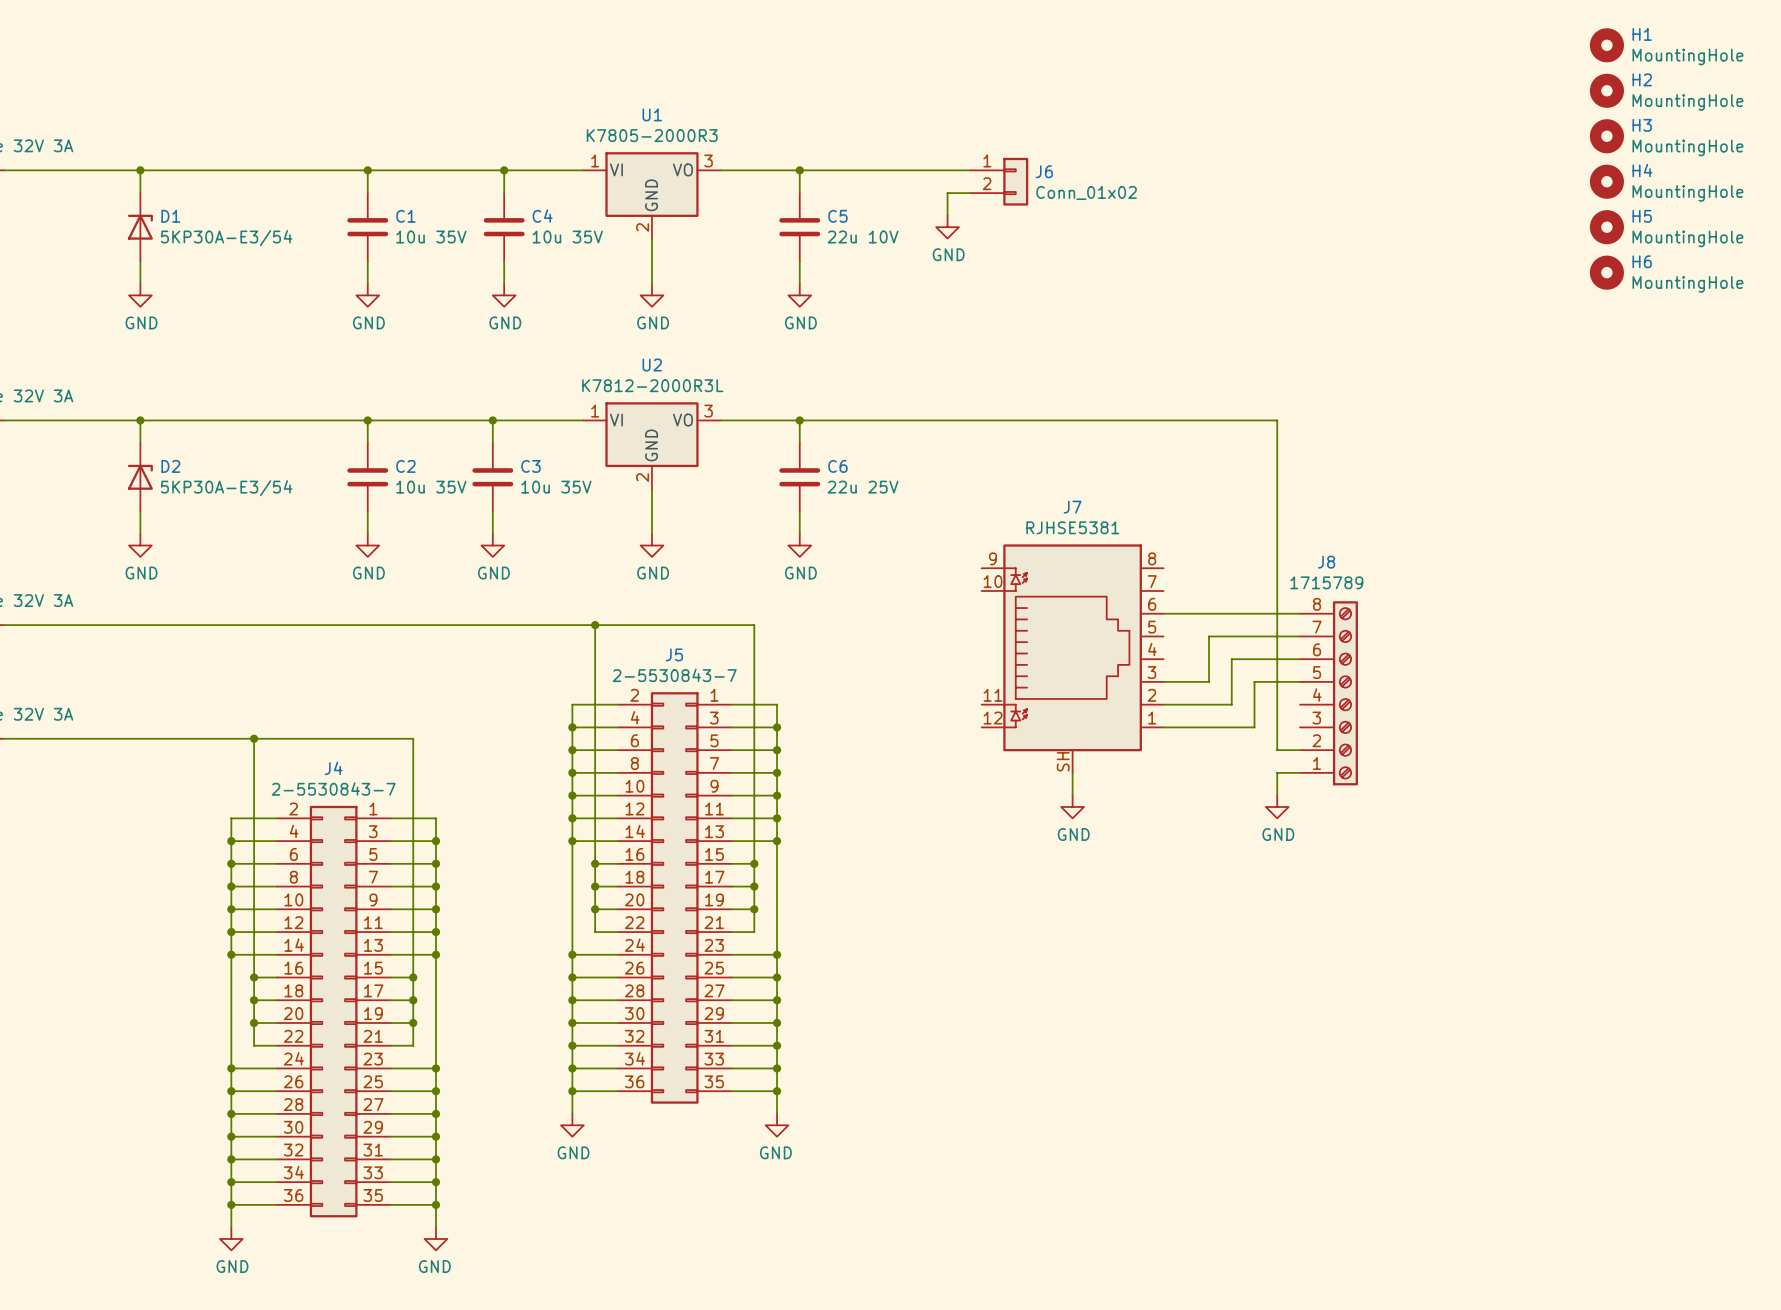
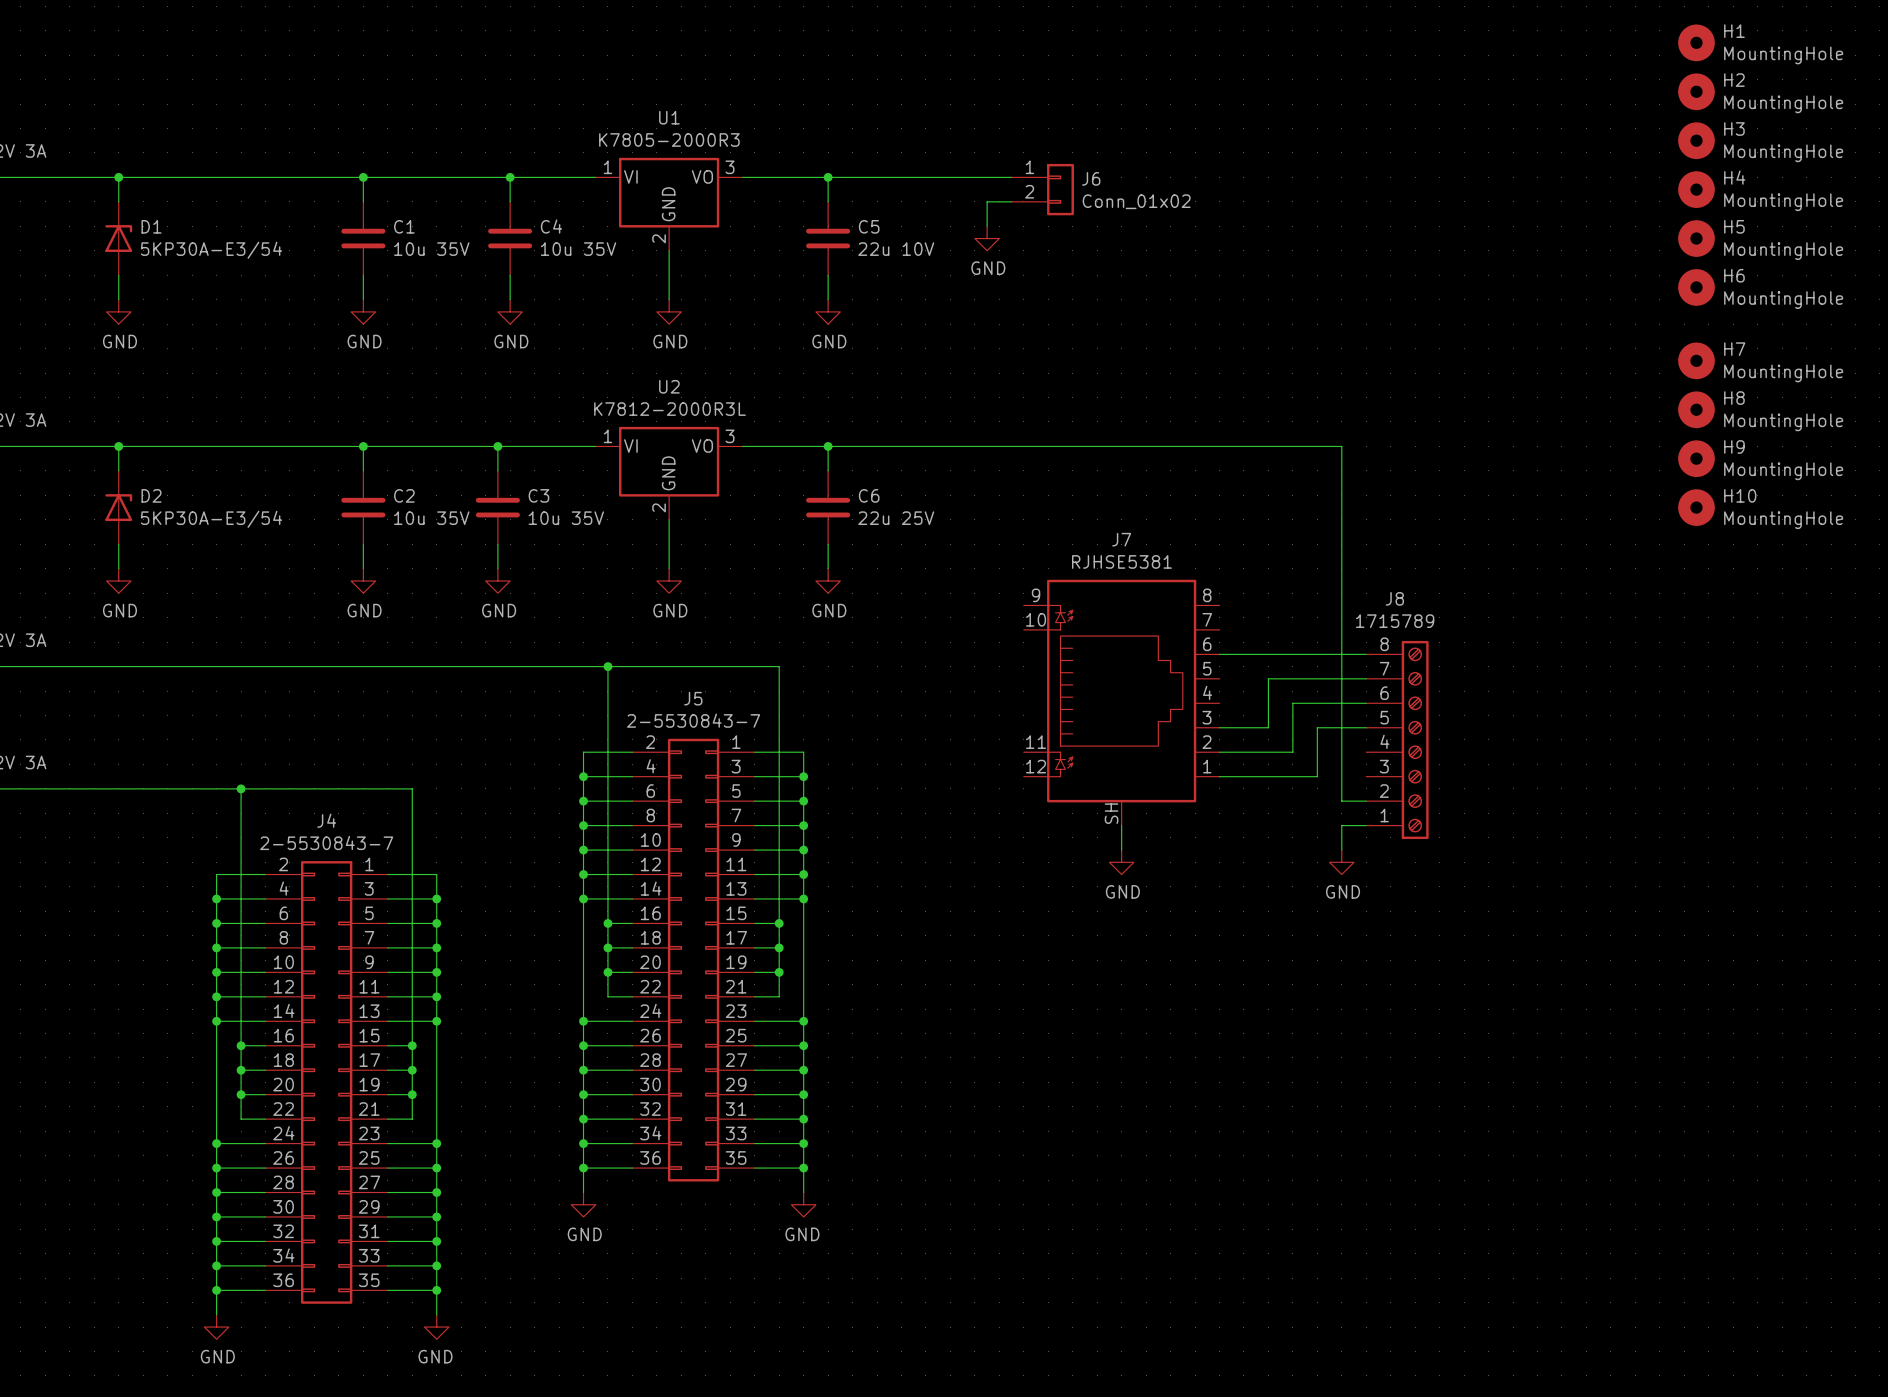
H7: none -> MountingHole (1696, 360)
H8: none -> MountingHole (1696, 409)
H9: none -> MountingHole (1696, 458)
H10: none -> MountingHole (1696, 507)

